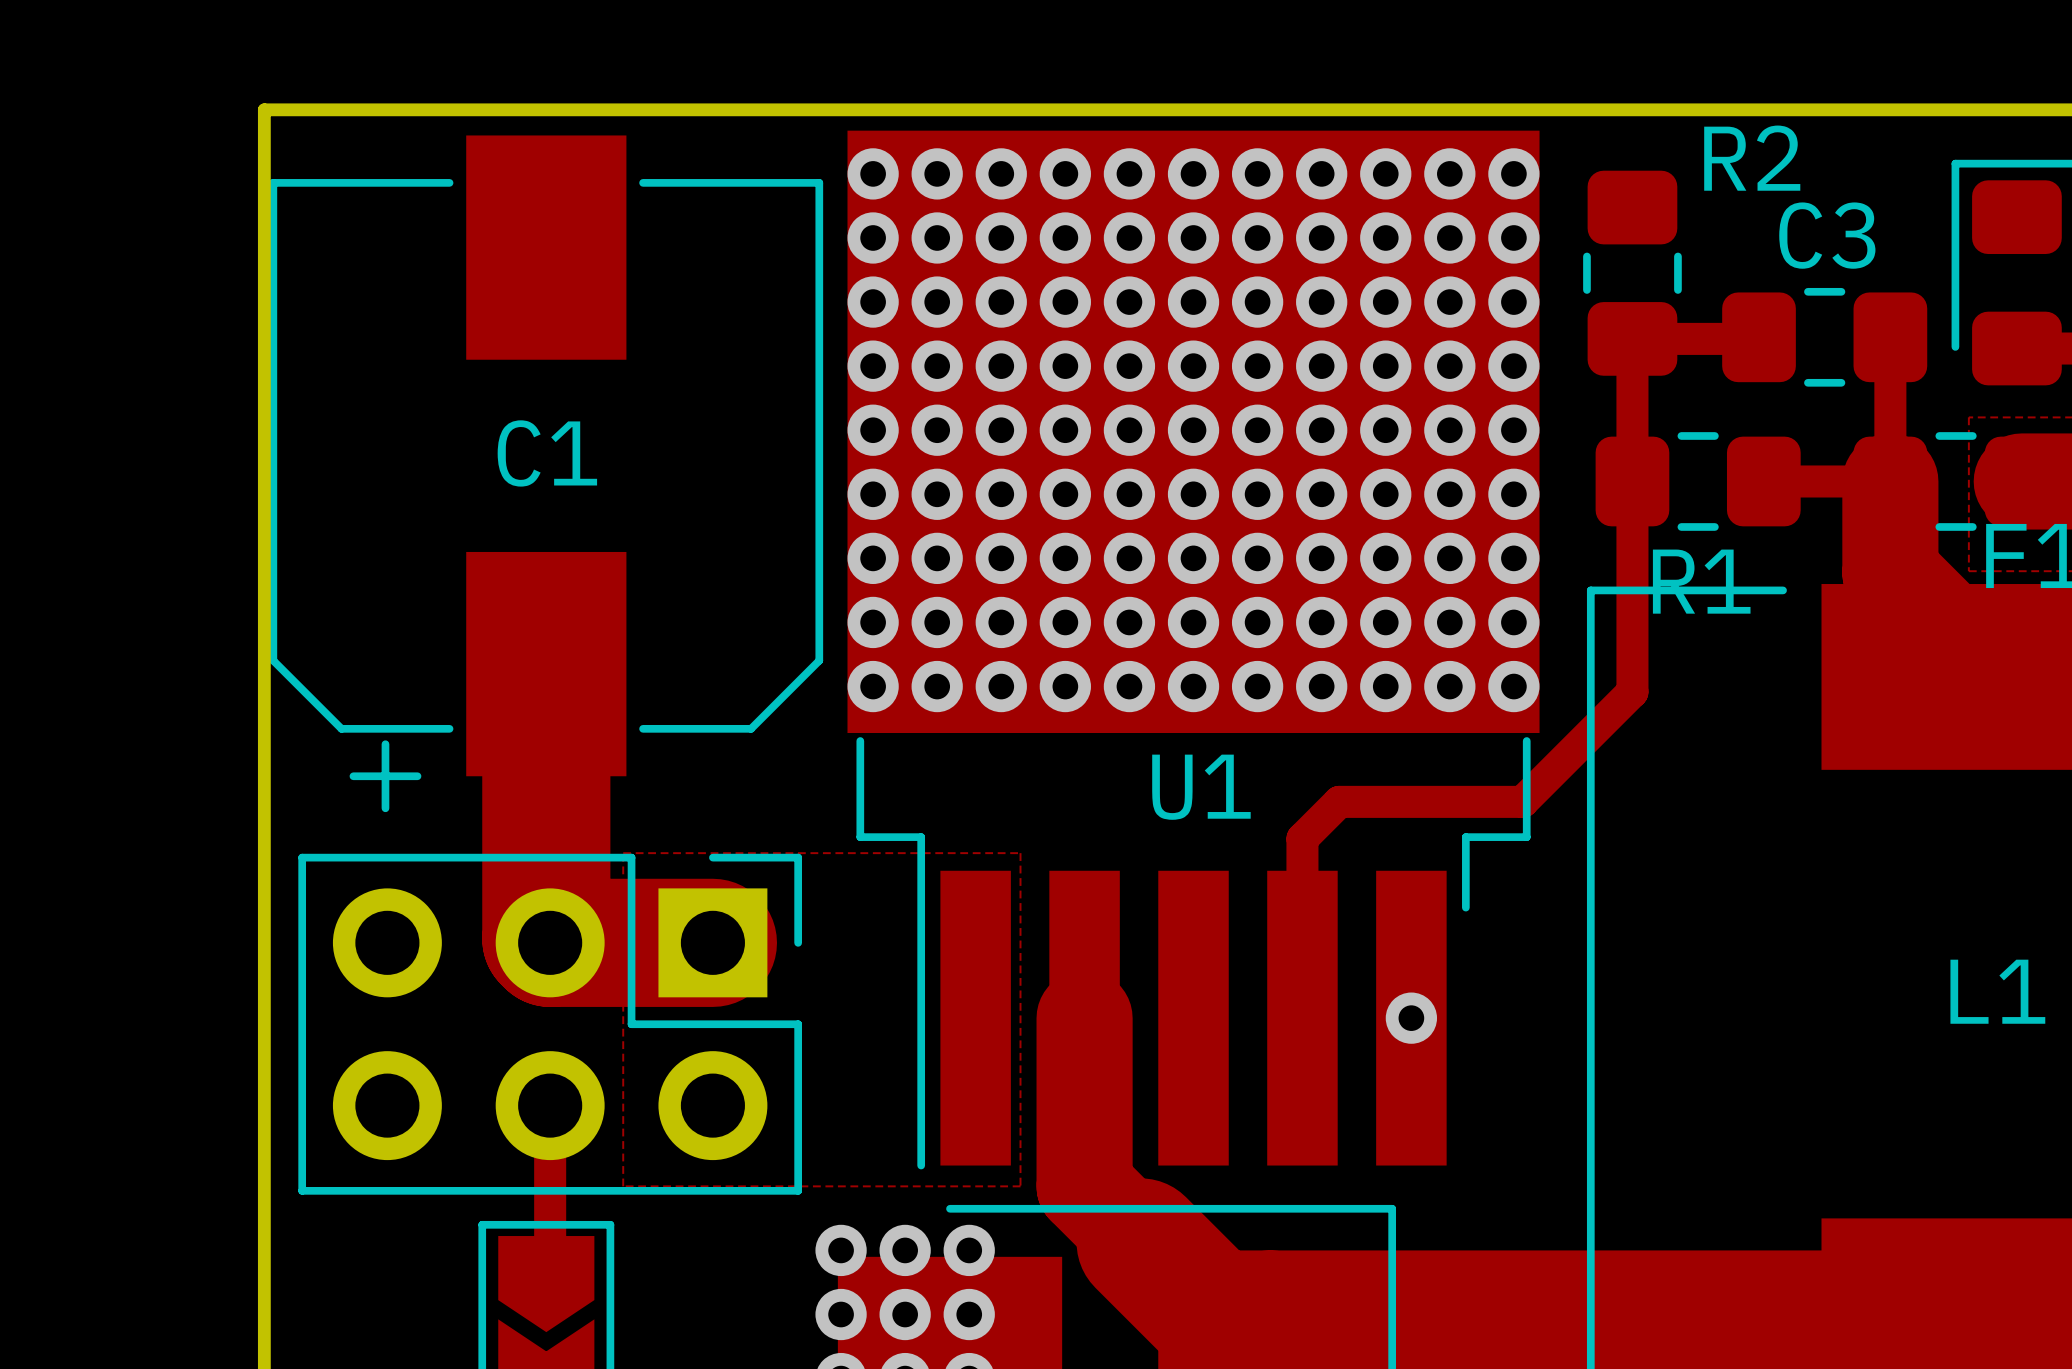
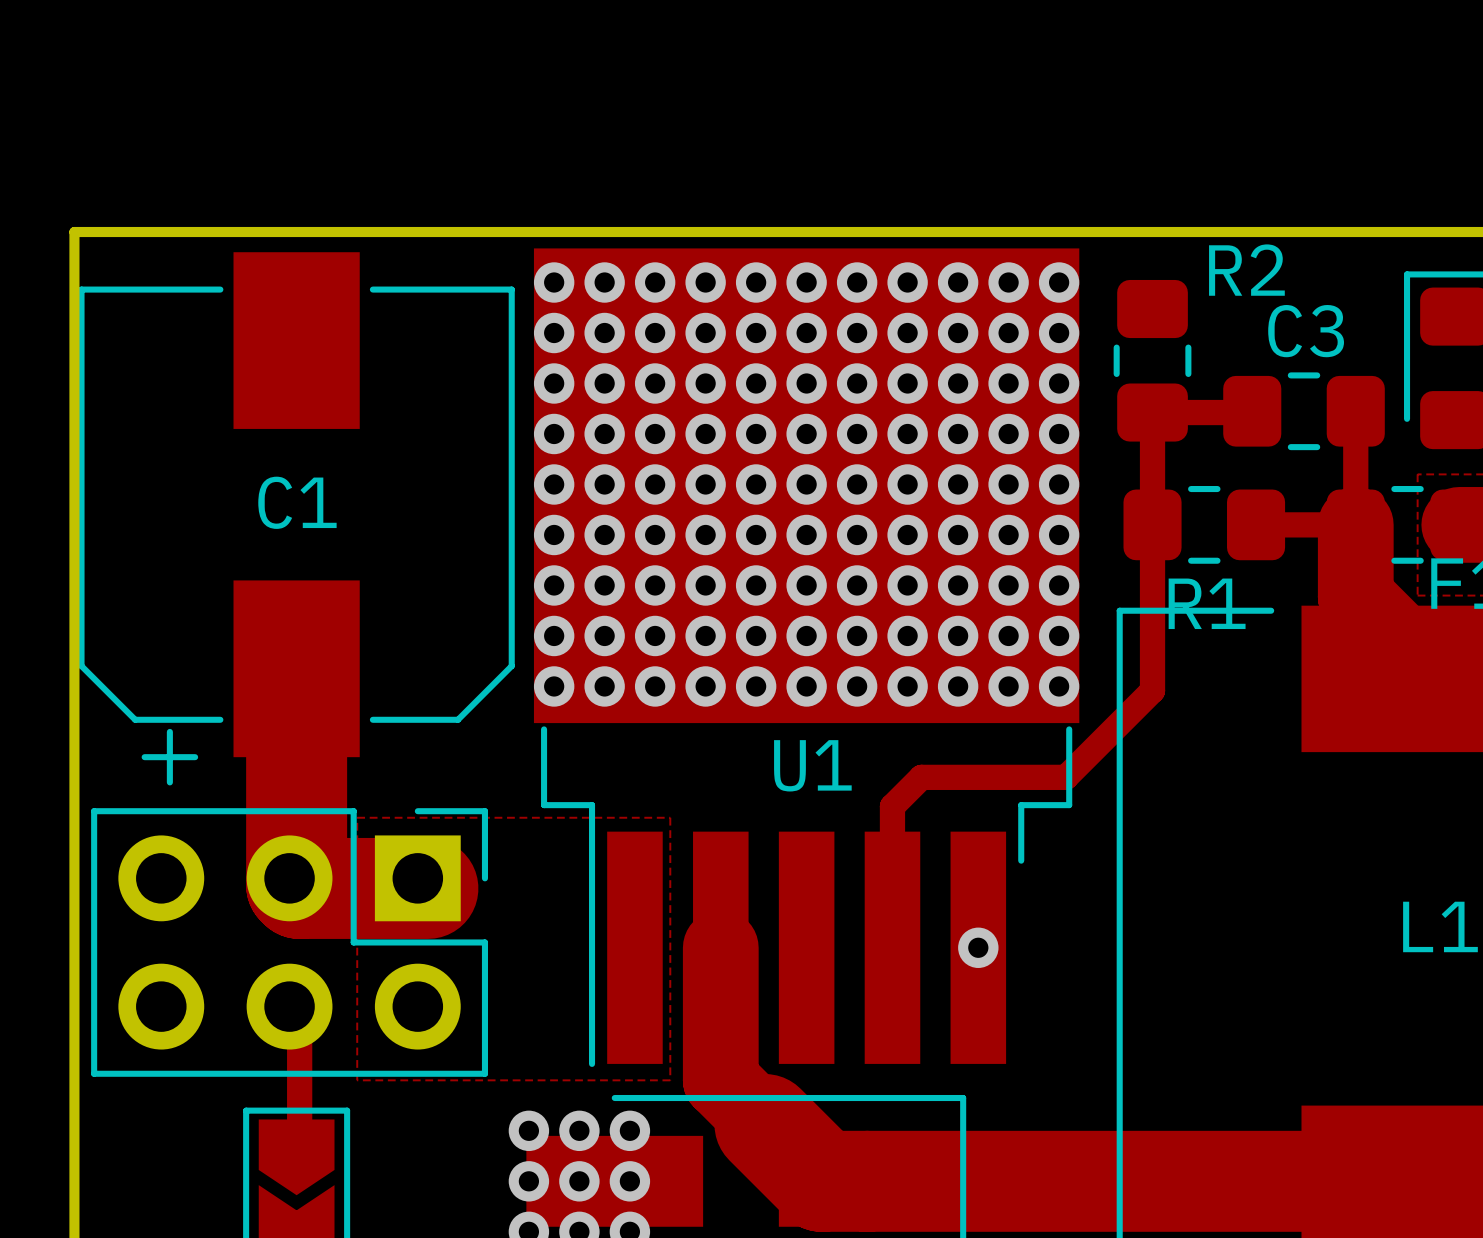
part position: (550, 1024) -> (289, 942)

